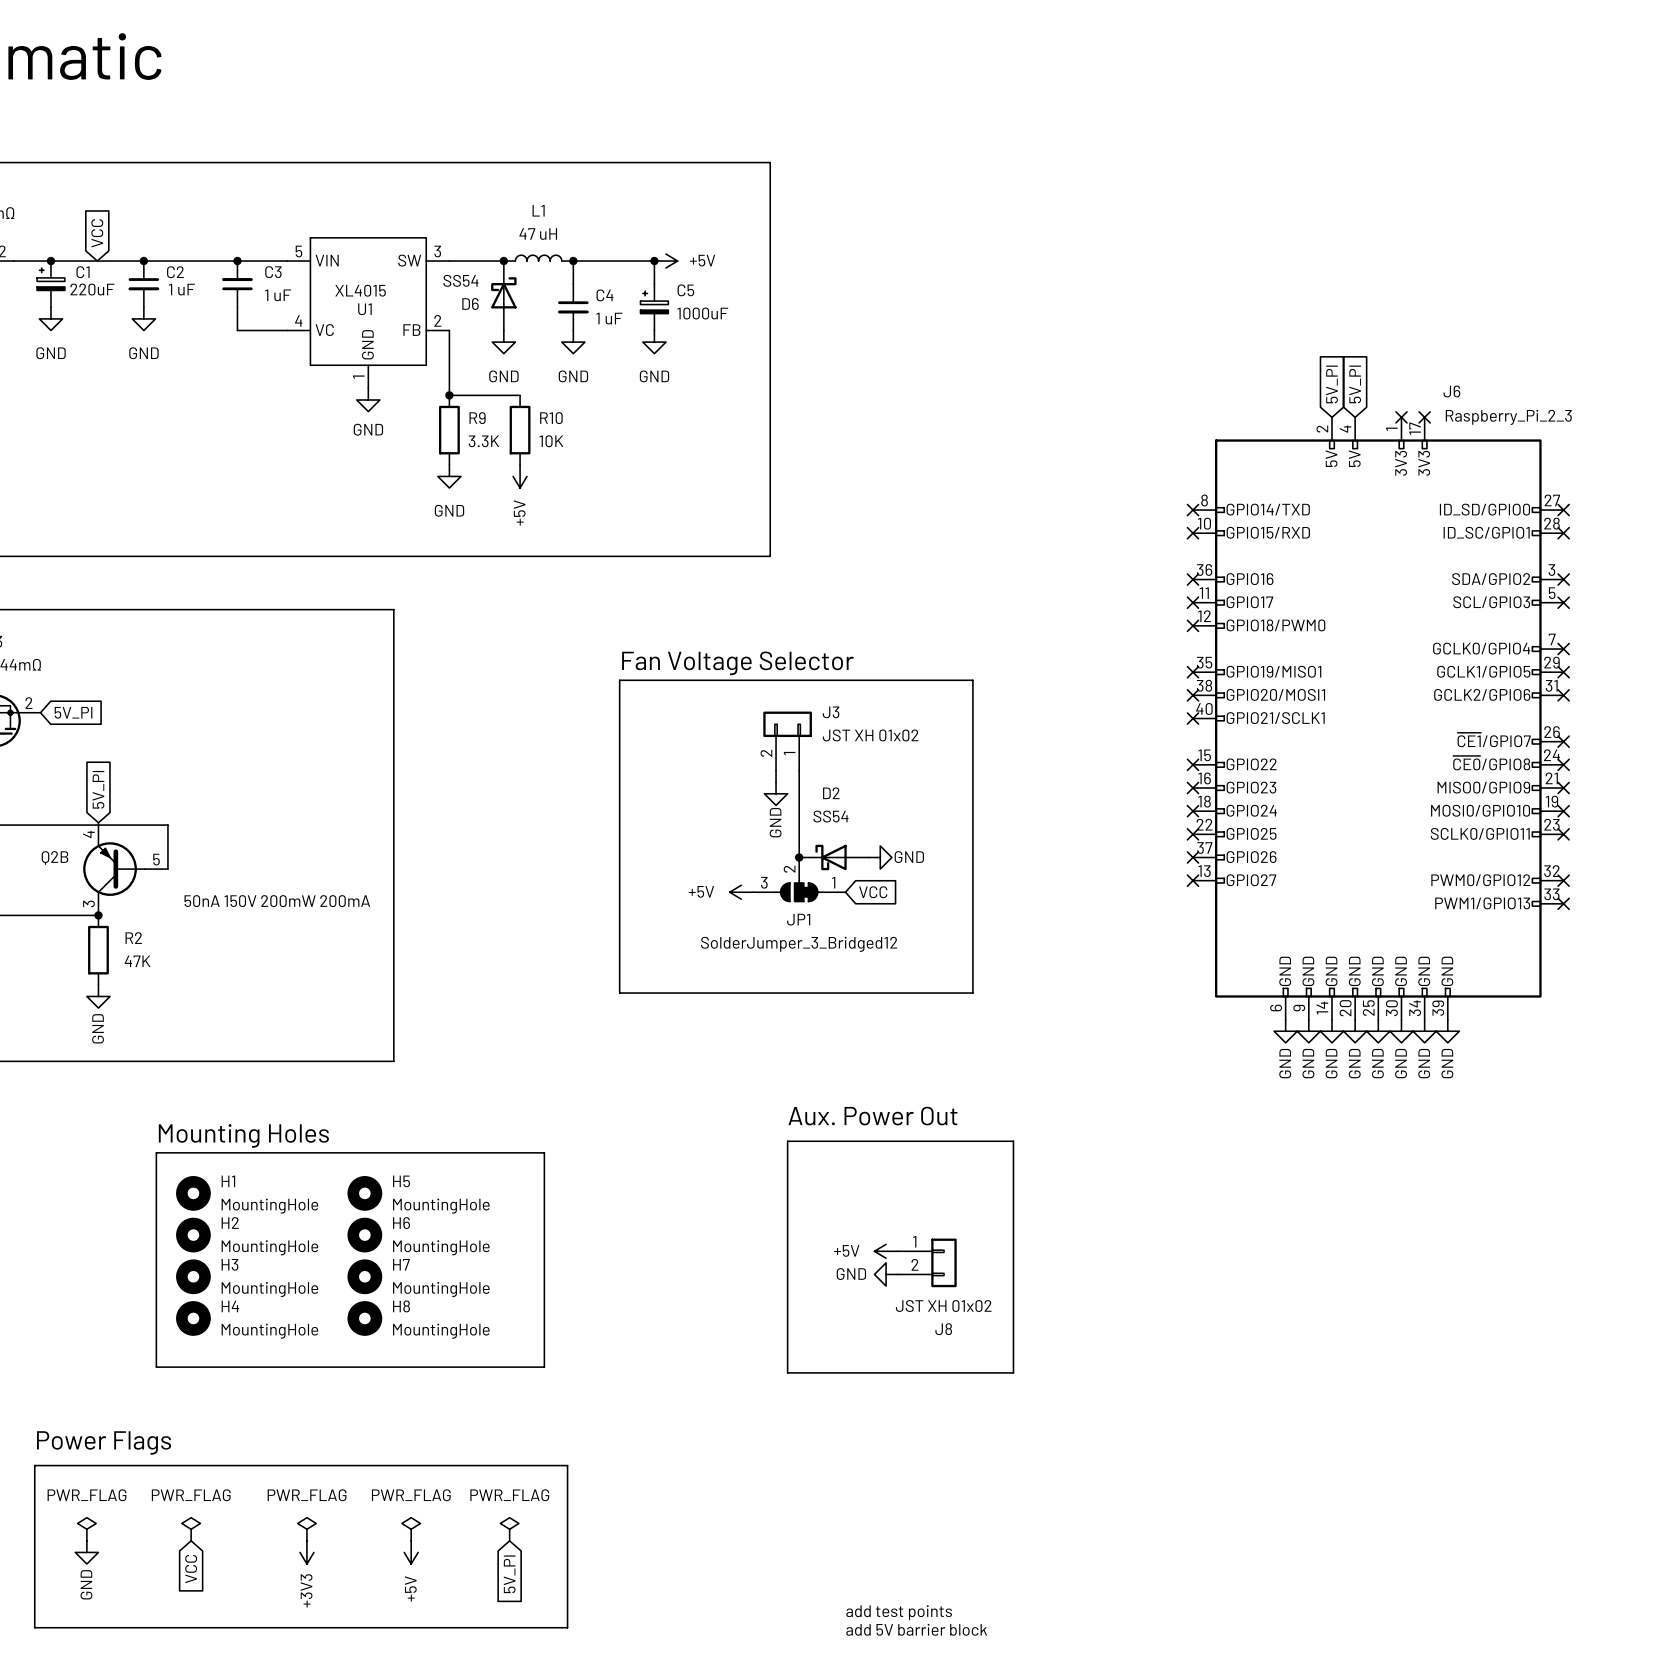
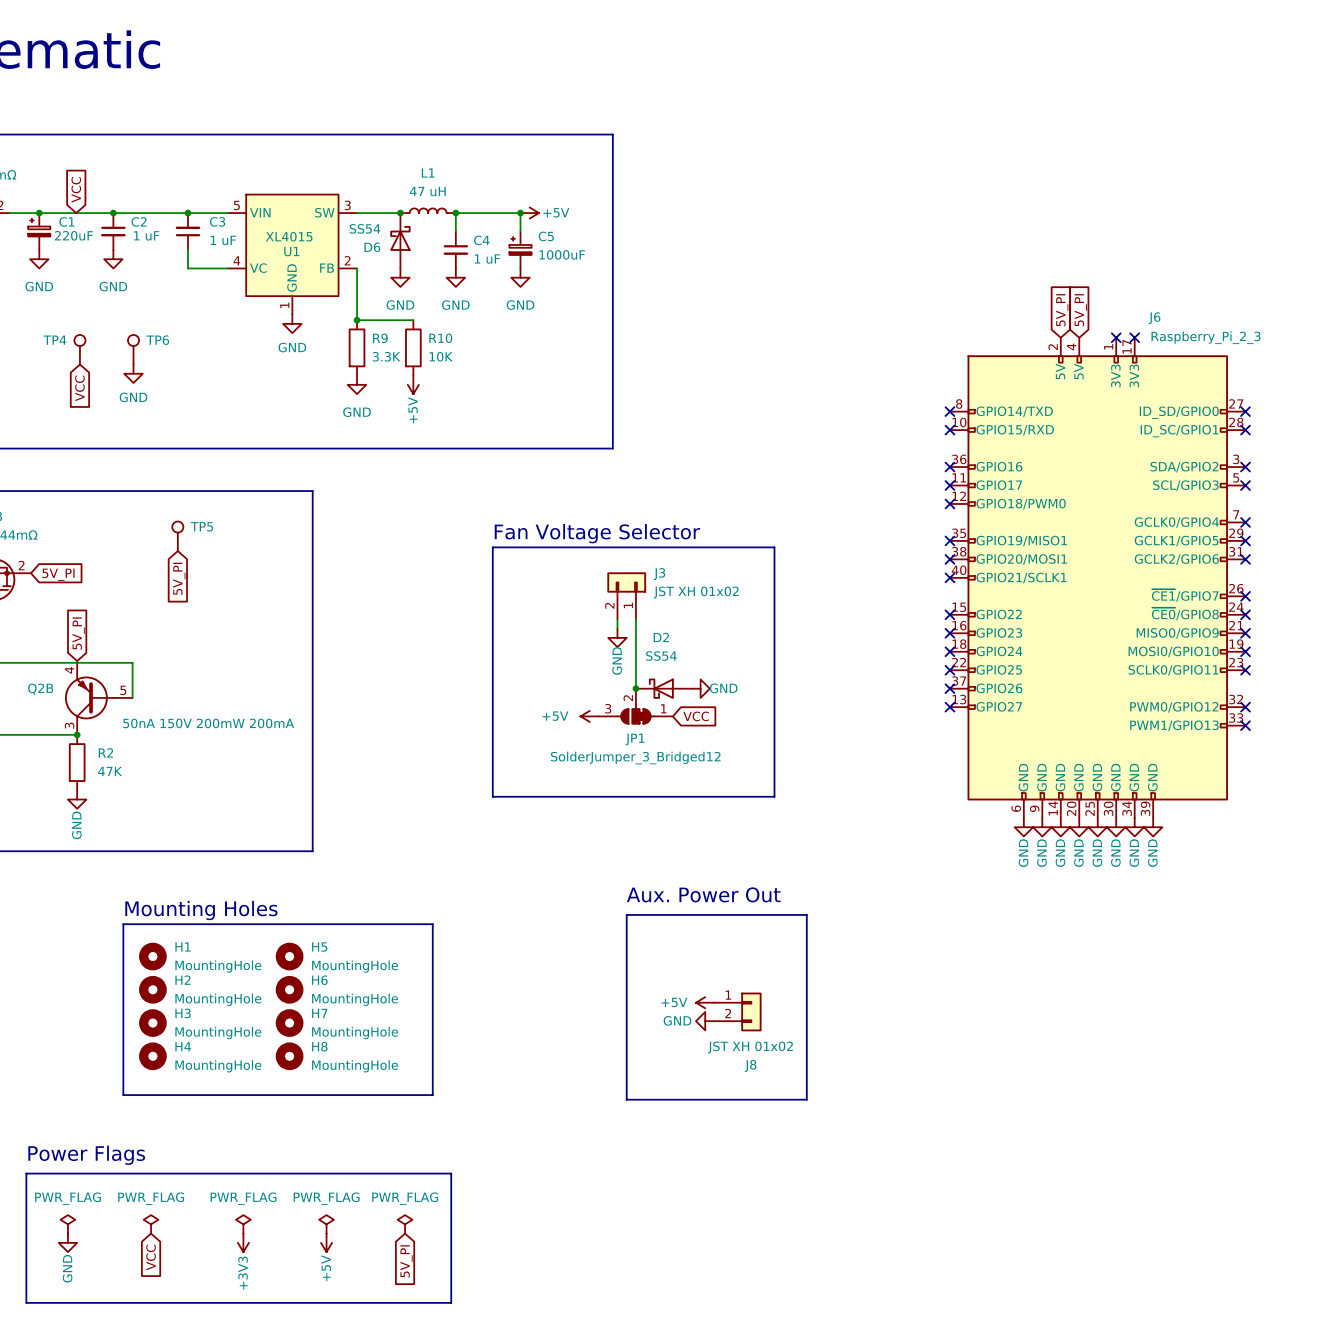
TP4: none -> (79, 349)
TP6: none -> (133, 349)
power symbol: none -> GND (133, 373)
global label: none -> VCC (79, 388)
TP5: none -> (177, 536)
global label: none -> 5V_PI (179, 578)
text: add test points (899, 1612) -> none
text: add 5V barrier block (916, 1629) -> none

